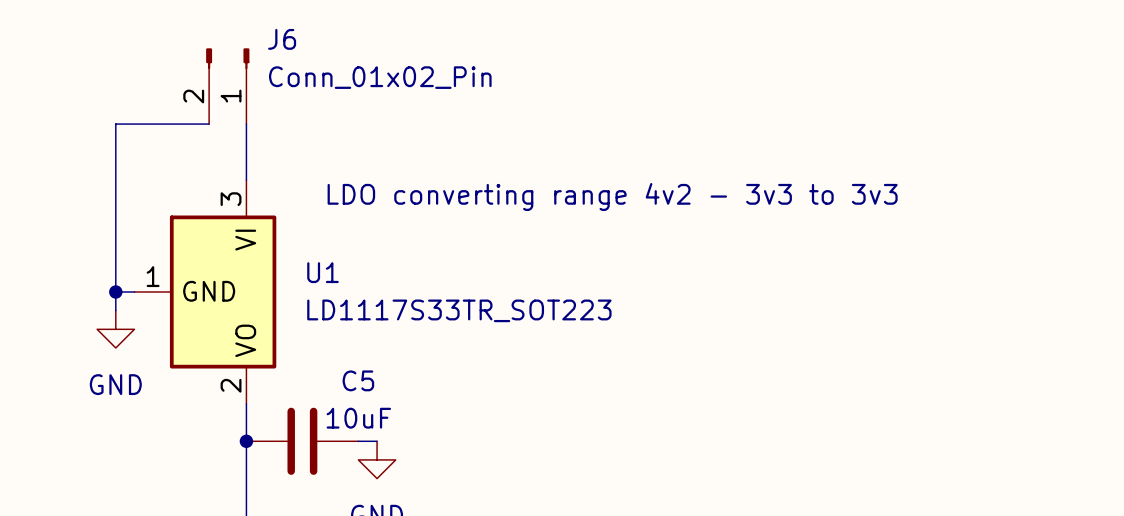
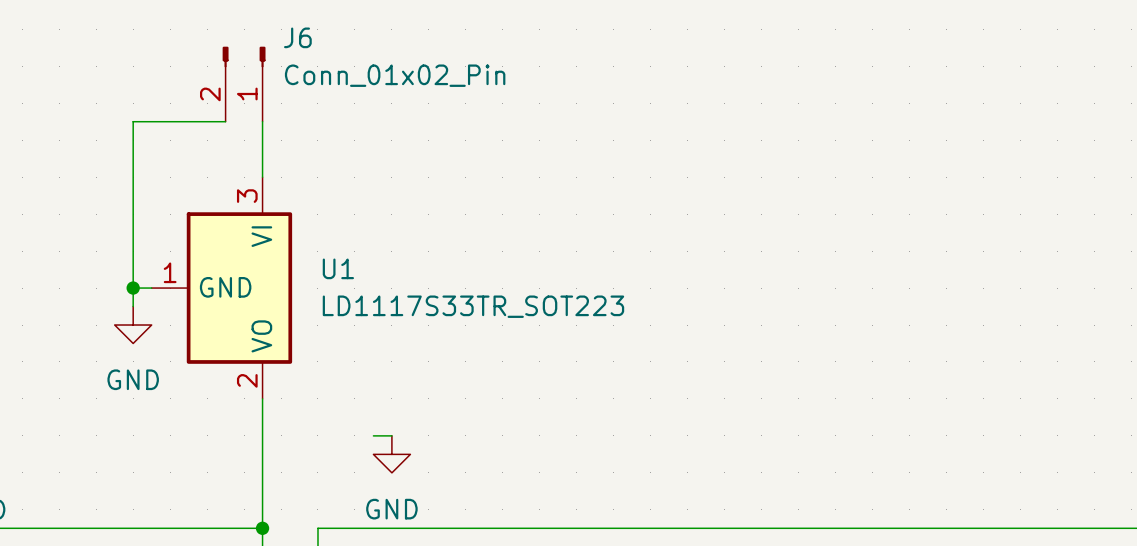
text: LDO converting range 4v2 - 3v3 to 3v3 (612, 196) -> none
junction: (246, 441) -> none
C5: 10uF (302, 441) -> none

